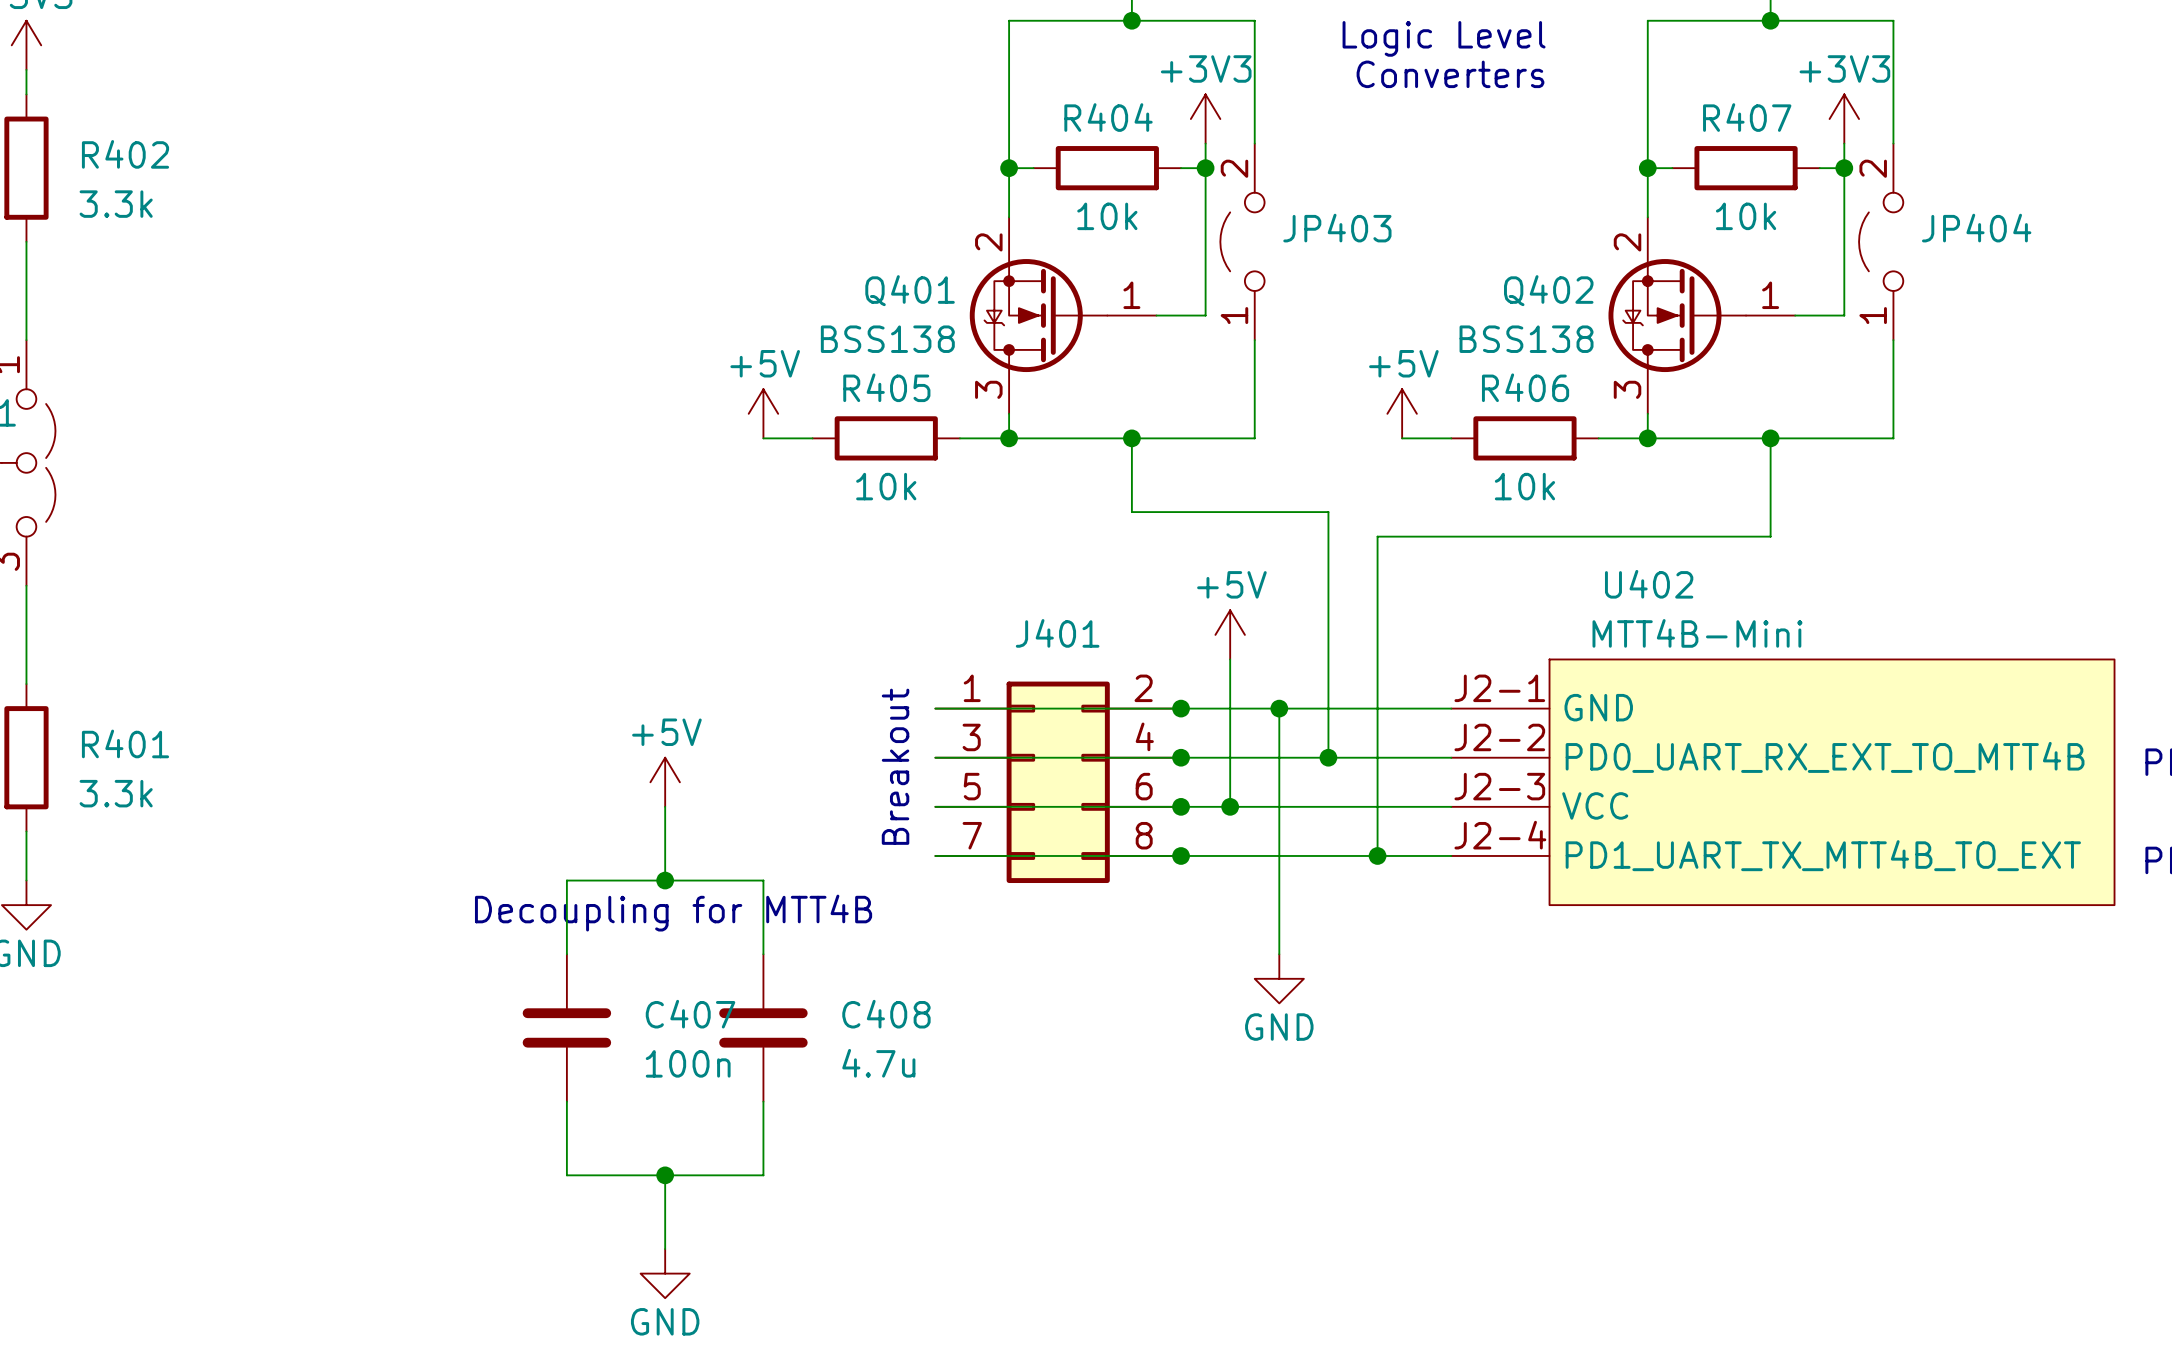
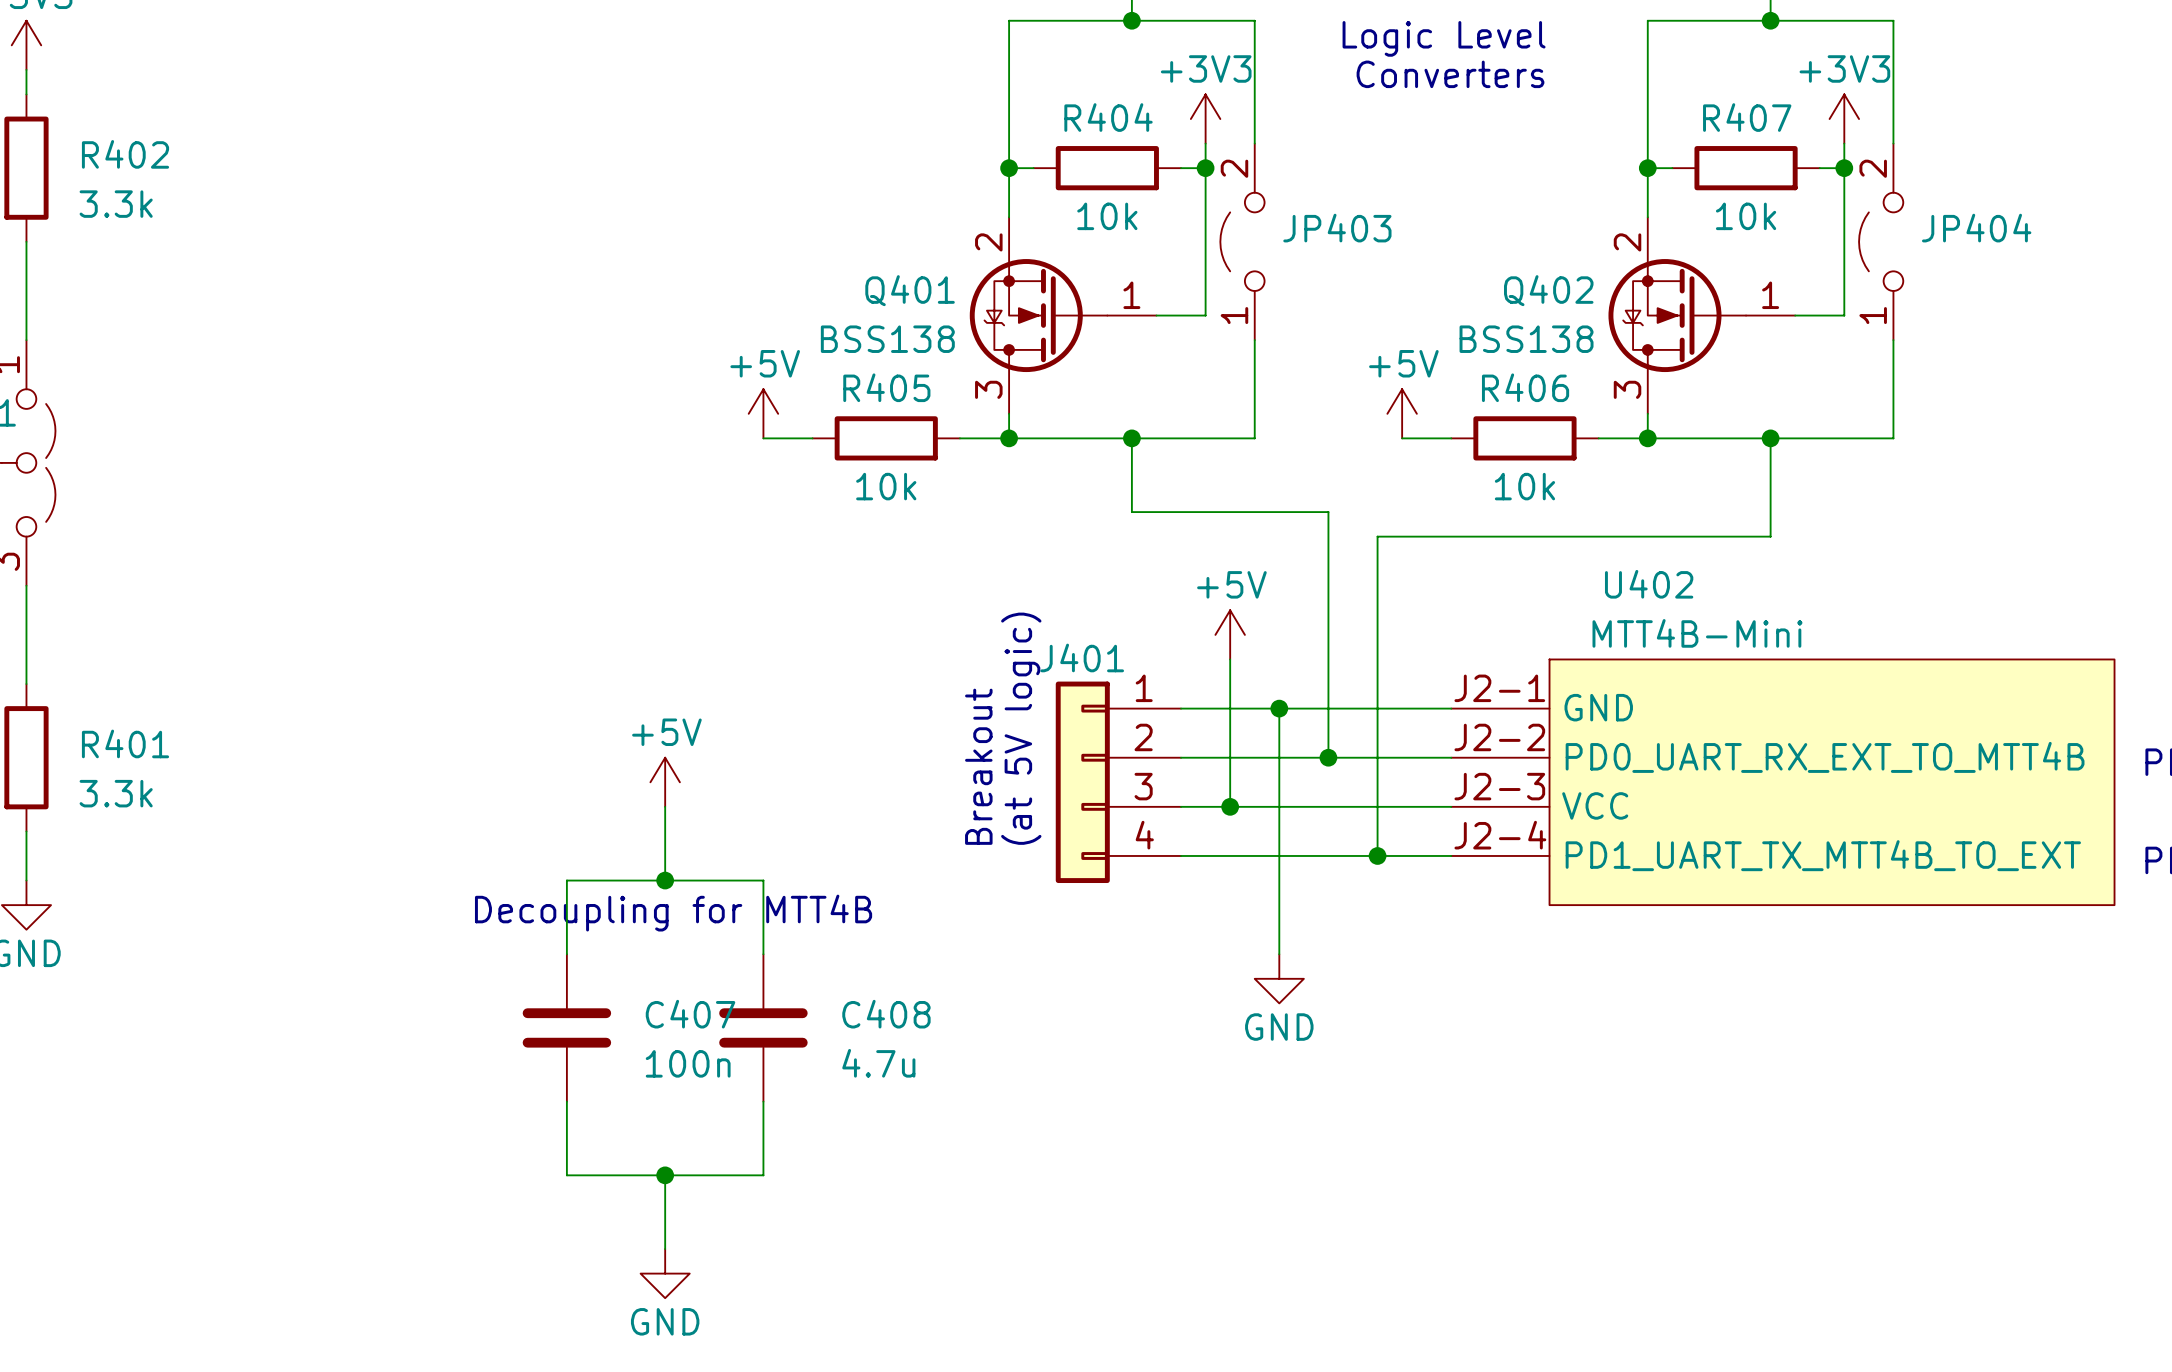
J401 name position: J401 (1057, 633) -> J401 (1082, 657)
J401 symbol: [935, 681, 1182, 884] -> [1055, 681, 1182, 884]
junction: (1181, 708) -> none
text: none -> (at 5V logic) (1021, 728)
junction: (1181, 757) -> none
text position: Breakout (895, 766) -> Breakout (978, 766)
junction: (1181, 806) -> none
junction: (1181, 855) -> none

